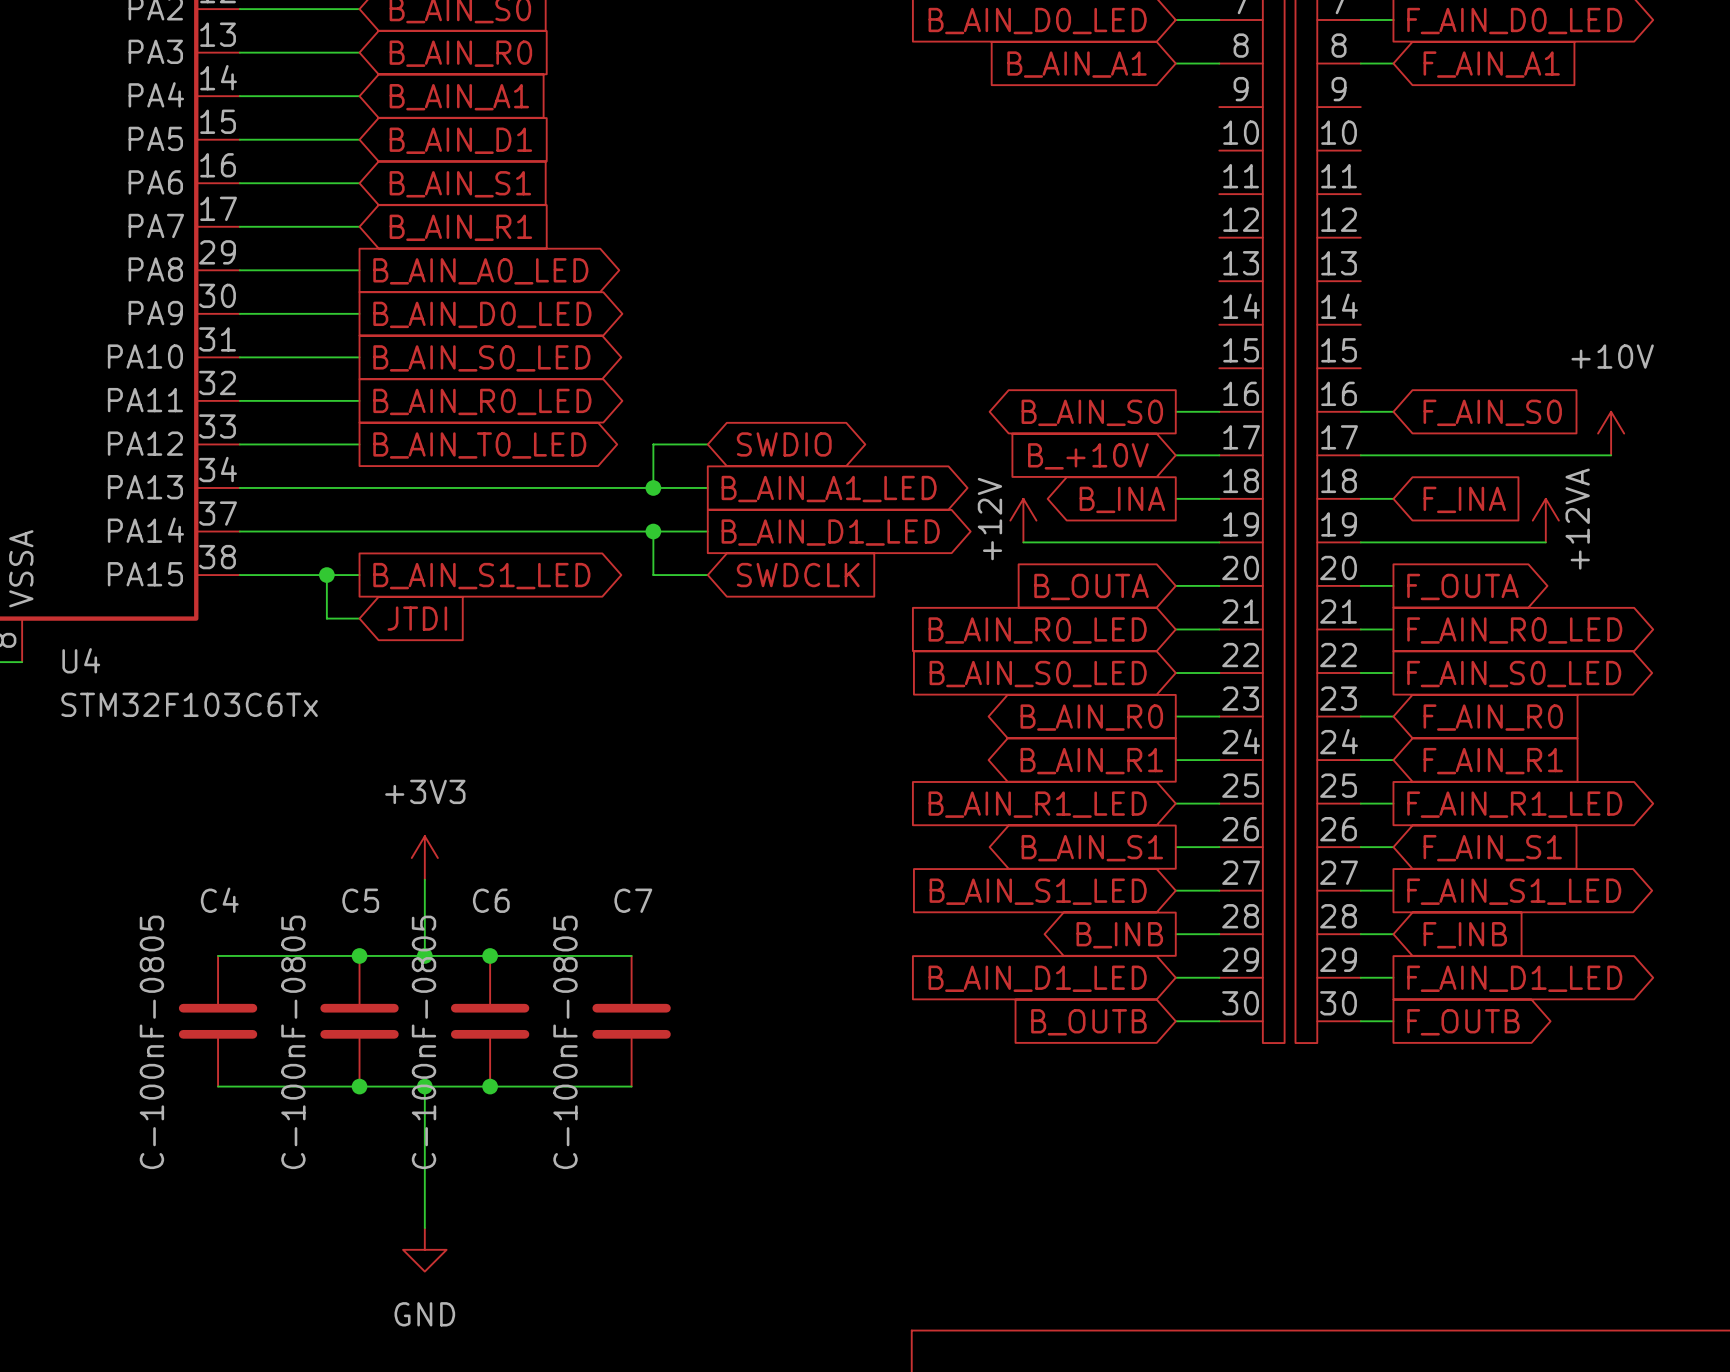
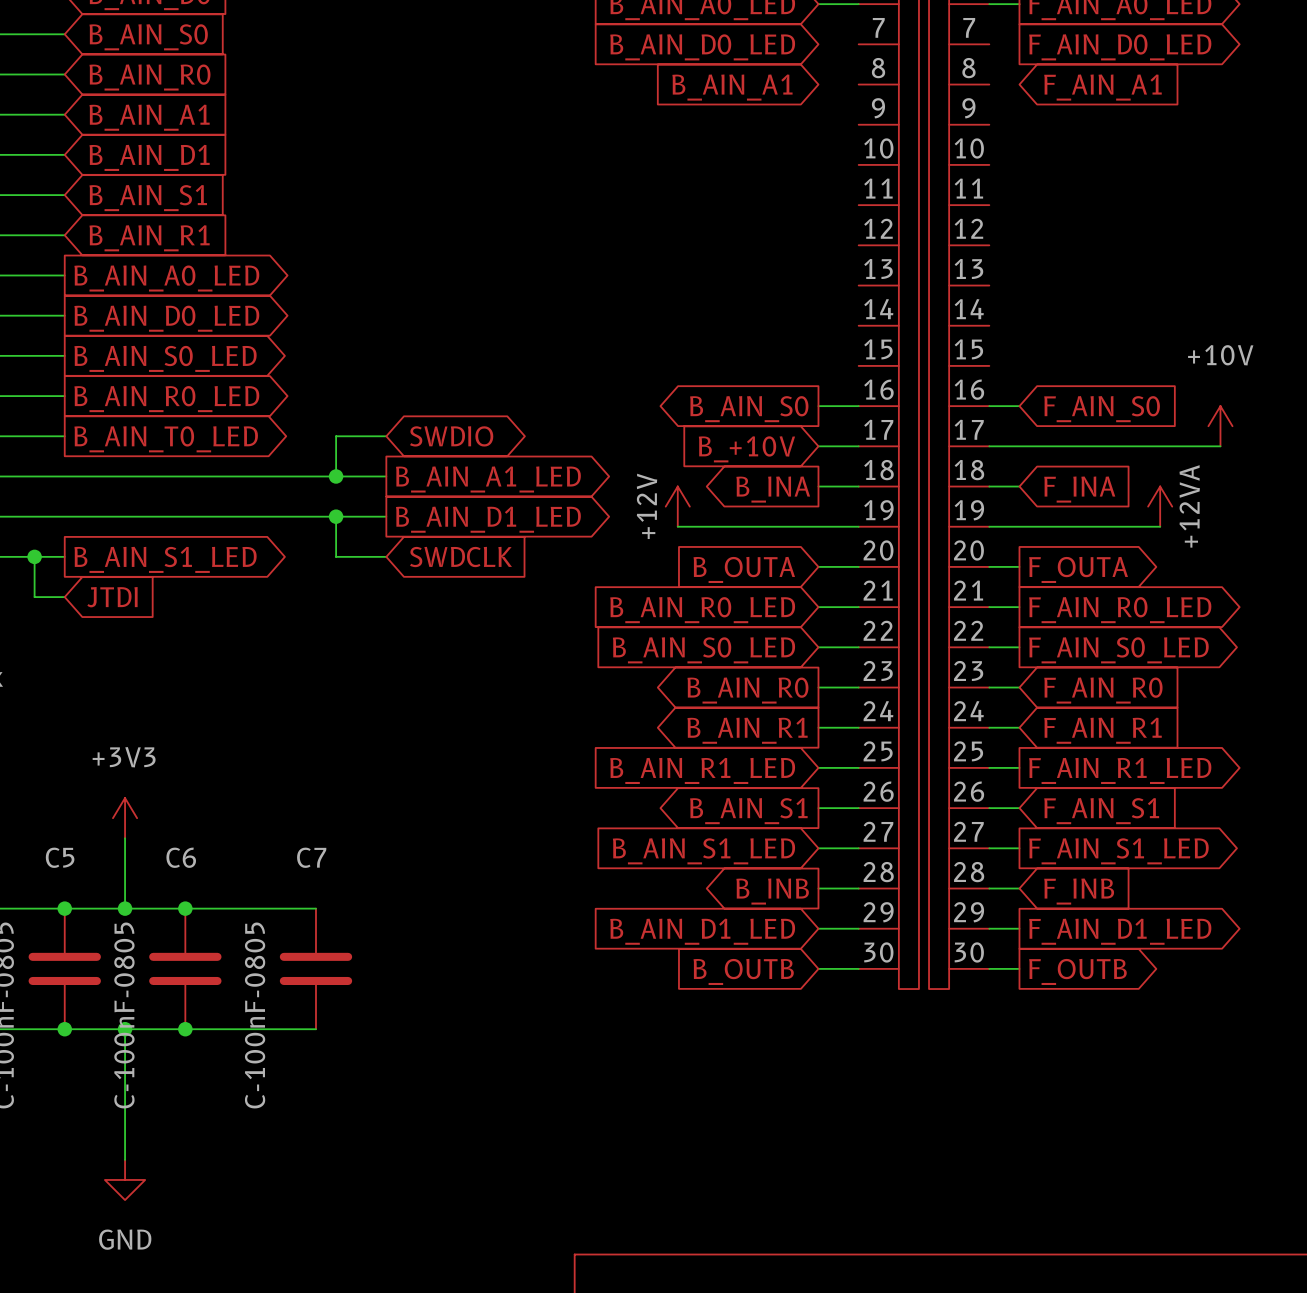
wire: (1175, 20) (1219, 20) -> none
wire: (1360, 20) (1393, 20) -> none
wire: (1175, 63) (1219, 63) -> none
wire: (1360, 63) (1393, 63) -> none

